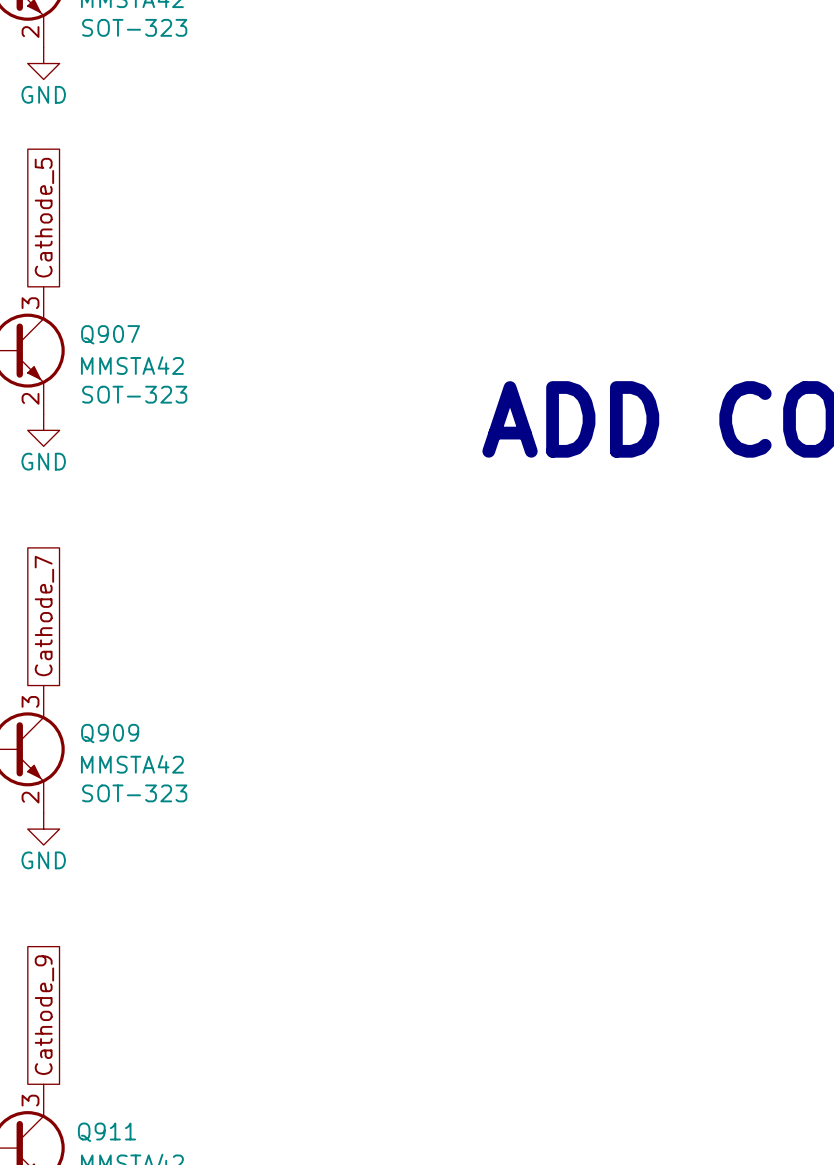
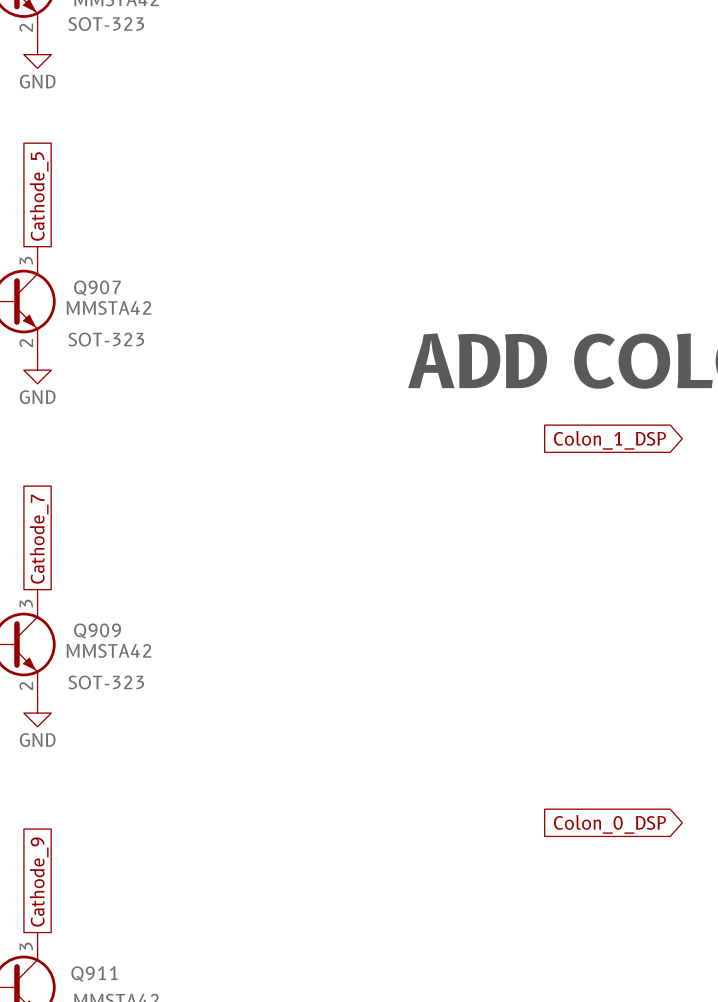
Q907 value position: MMSTA42 (132, 365) -> MMSTA42 (108, 307)
global label: none -> Colon_1_DSP (609, 440)
Q909 value position: MMSTA42 (132, 764) -> MMSTA42 (108, 650)
global label: none -> Colon_0_DSP (609, 824)

